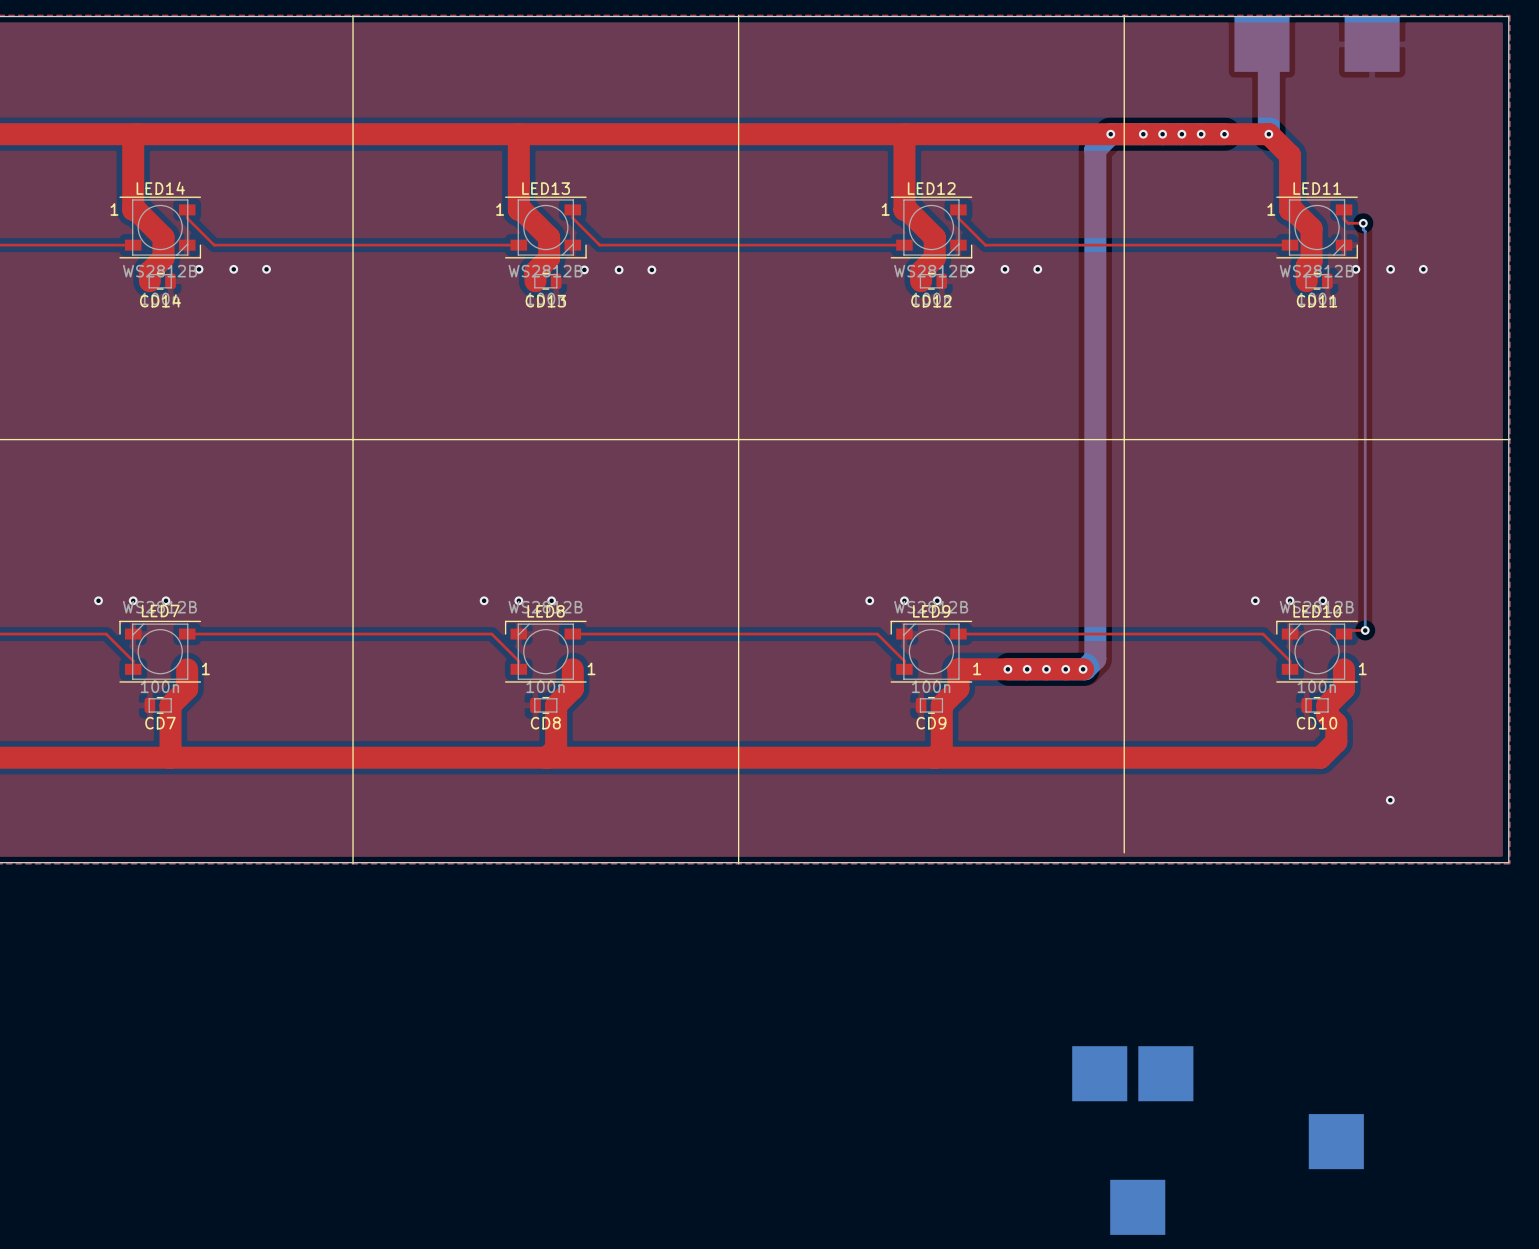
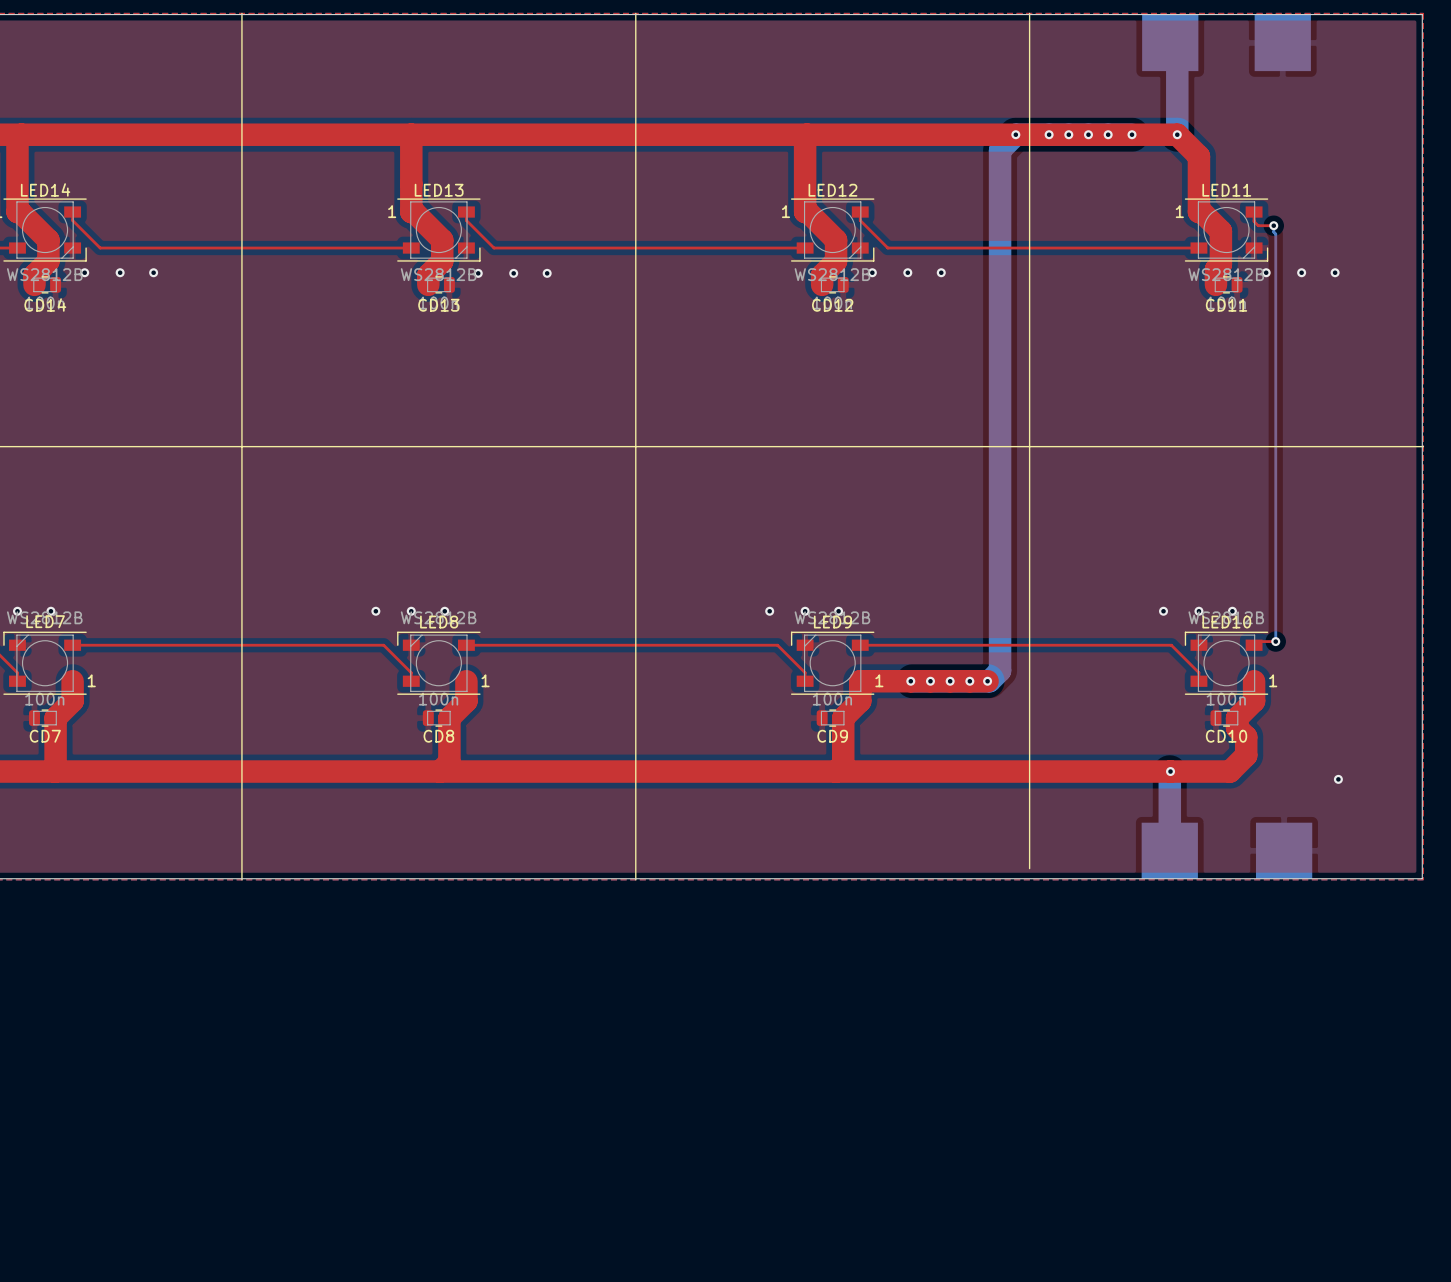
bottom track: none -> (1170, 771) (1169, 850)
via: none -> (1170, 771)
via position: (1390, 800) -> (1338, 779)
part: none -> (1169, 850)
part: none -> (1284, 850)
part: (1099, 1073) -> none
part: (1165, 1073) -> none
part: (1336, 1141) -> none
part: (1137, 1207) -> none

